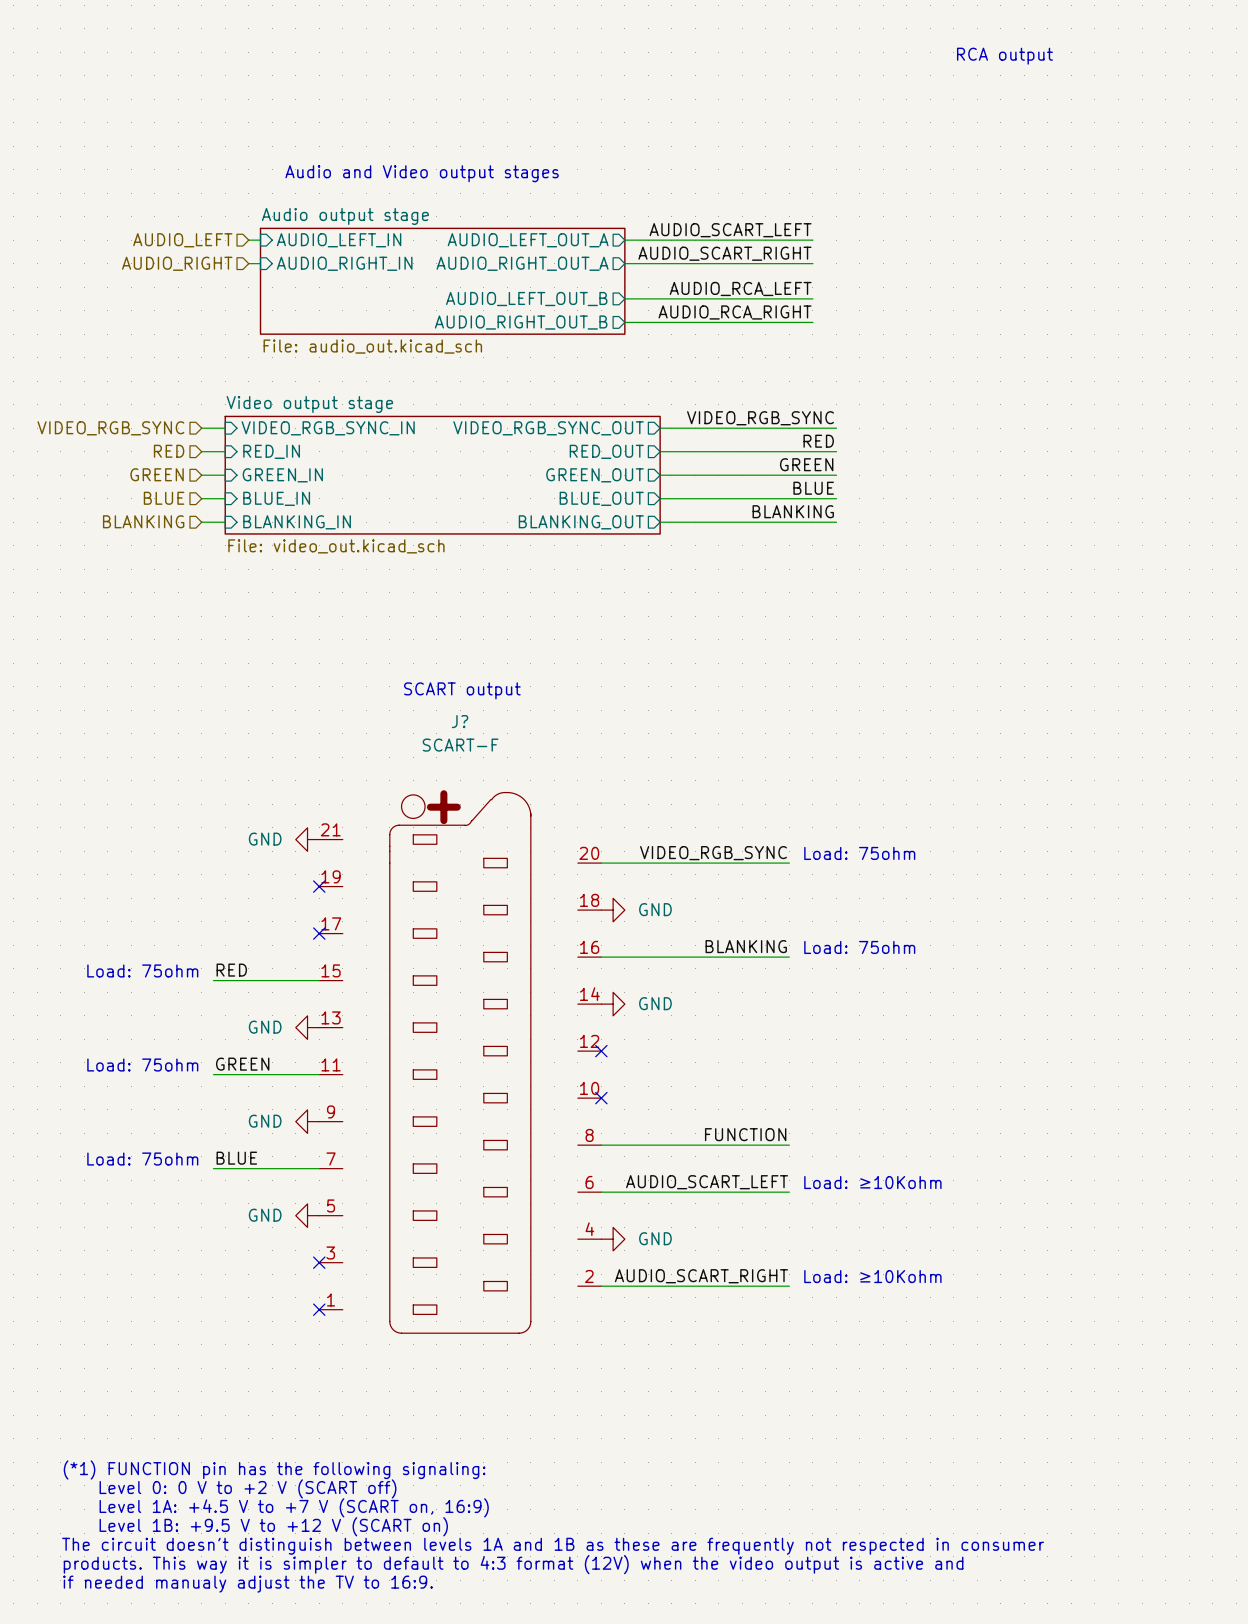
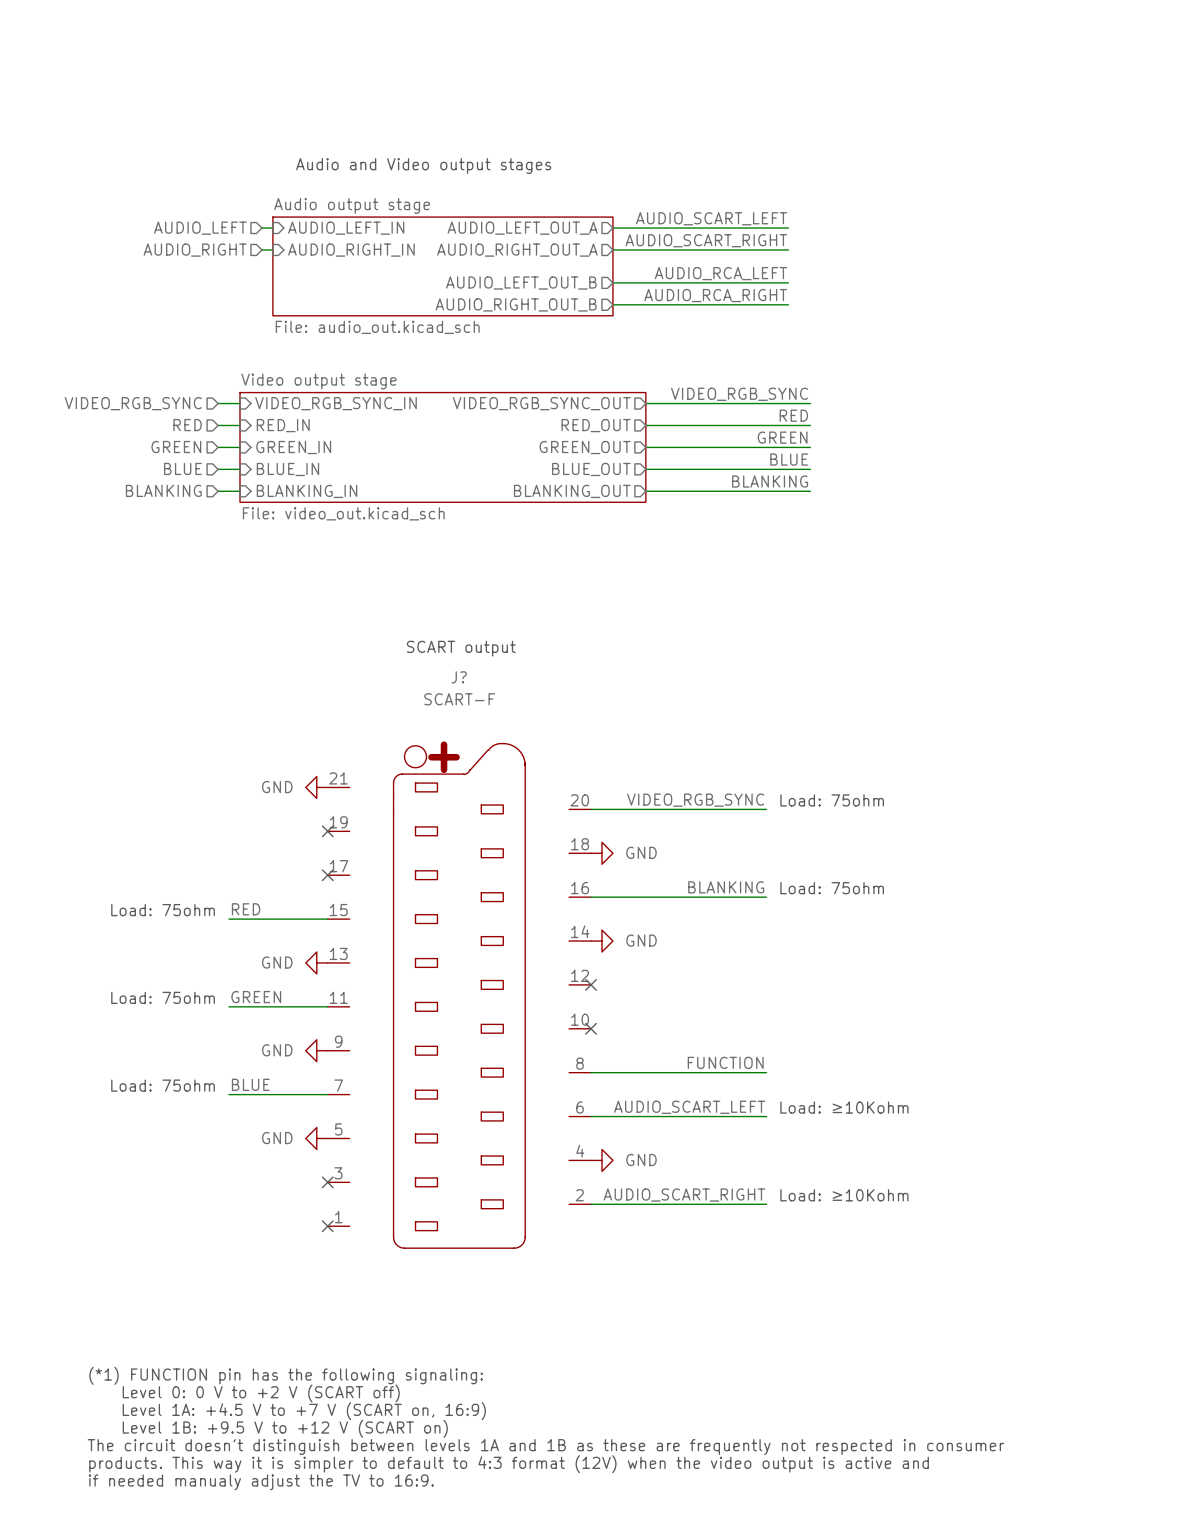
text: RCA output (1004, 56) -> none

